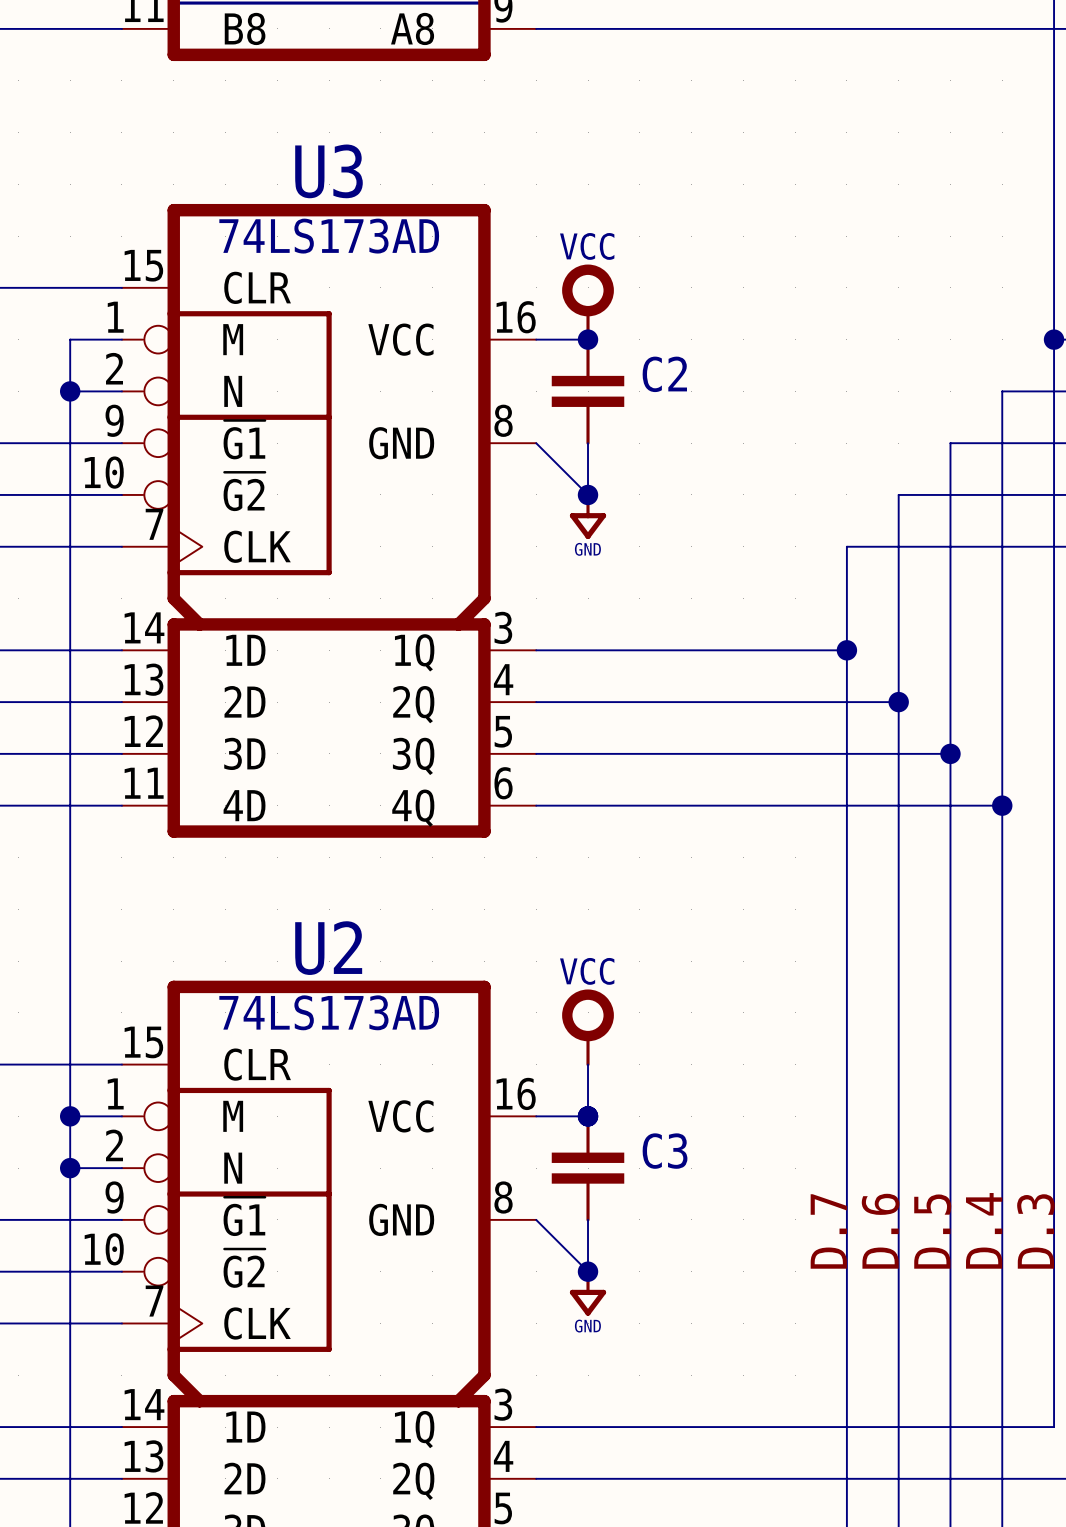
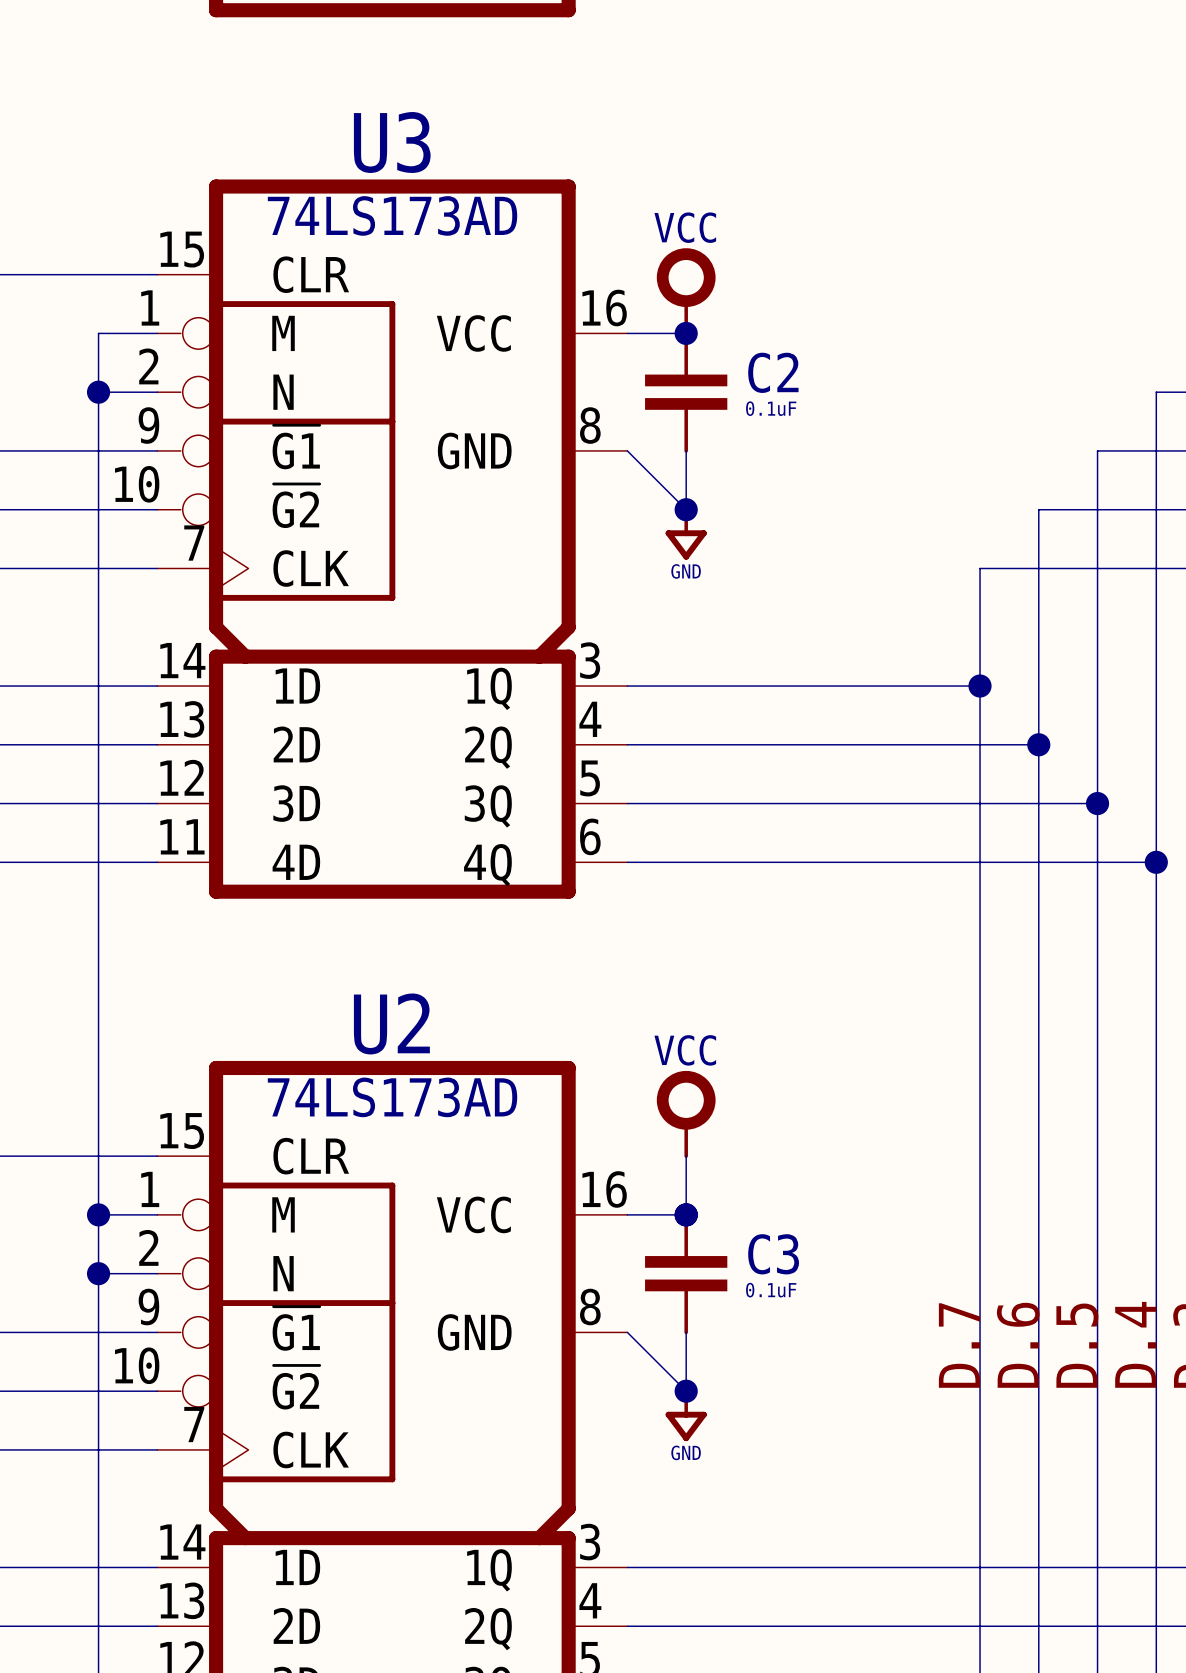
C2 value: none -> 0.1uF (771, 408)
C3 value: none -> 0.1uF (771, 1290)

